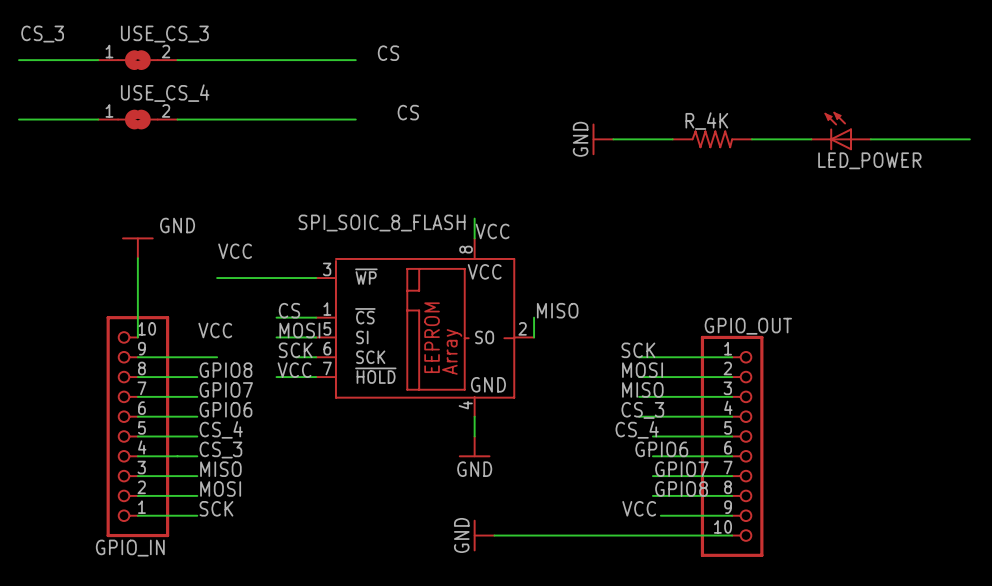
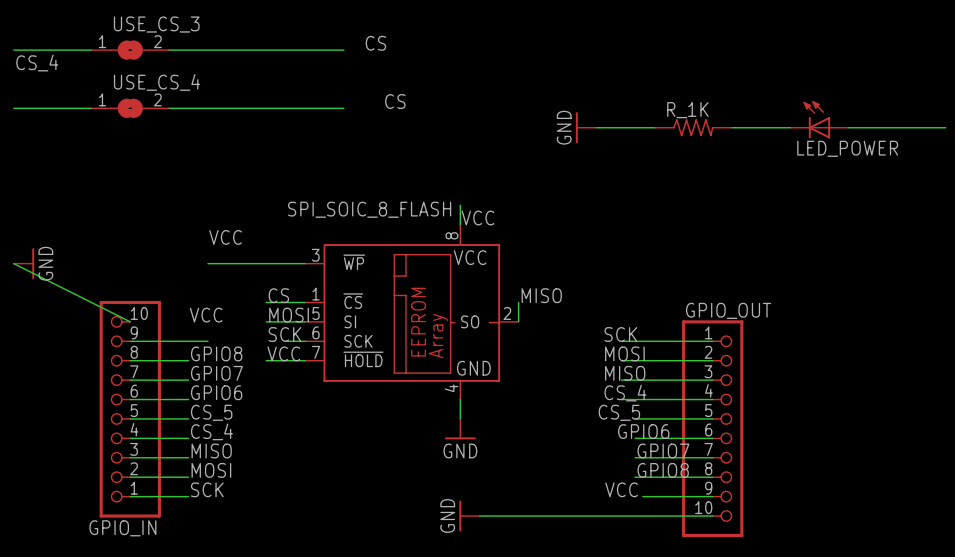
label: CS_3 (42, 34) -> none
label: none -> CS_4 (37, 63)
R_4K name: R_4K (706, 121) -> R_1K (687, 110)
power symbol text position: GND (177, 225) -> GND (45, 263)
power symbol rotation: 0° (137, 238) -> 90° clockwise (33, 263)
power symbol position: GND (137, 247) -> GND (24, 263)
wire: (137, 258) (137, 337) -> (13, 263) (130, 321)
label: CS_3 (642, 410) -> CS_4 (625, 393)
label: CS_4 (221, 429) -> CS_5 (211, 412)
label: CS_4 (637, 429) -> CS_5 (619, 412)
label: CS_3 (220, 450) -> CS_4 (211, 431)

